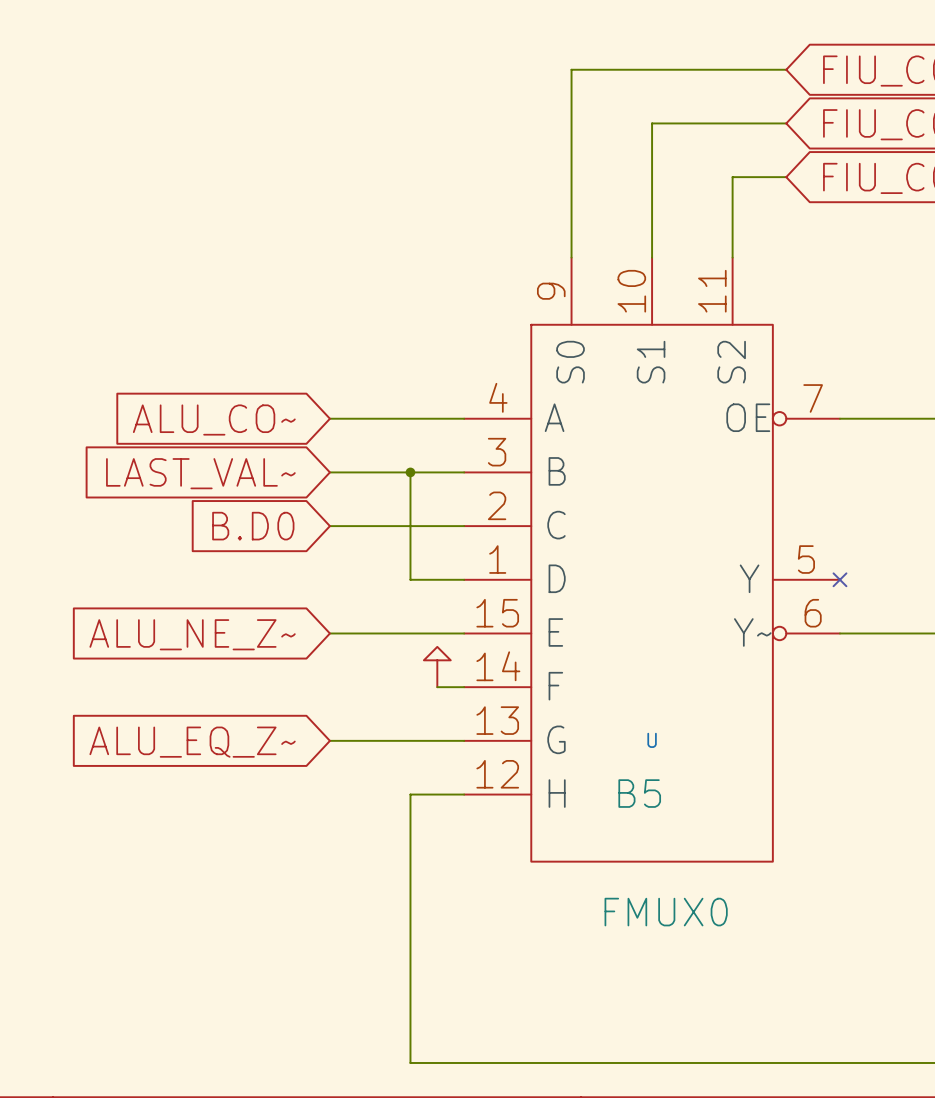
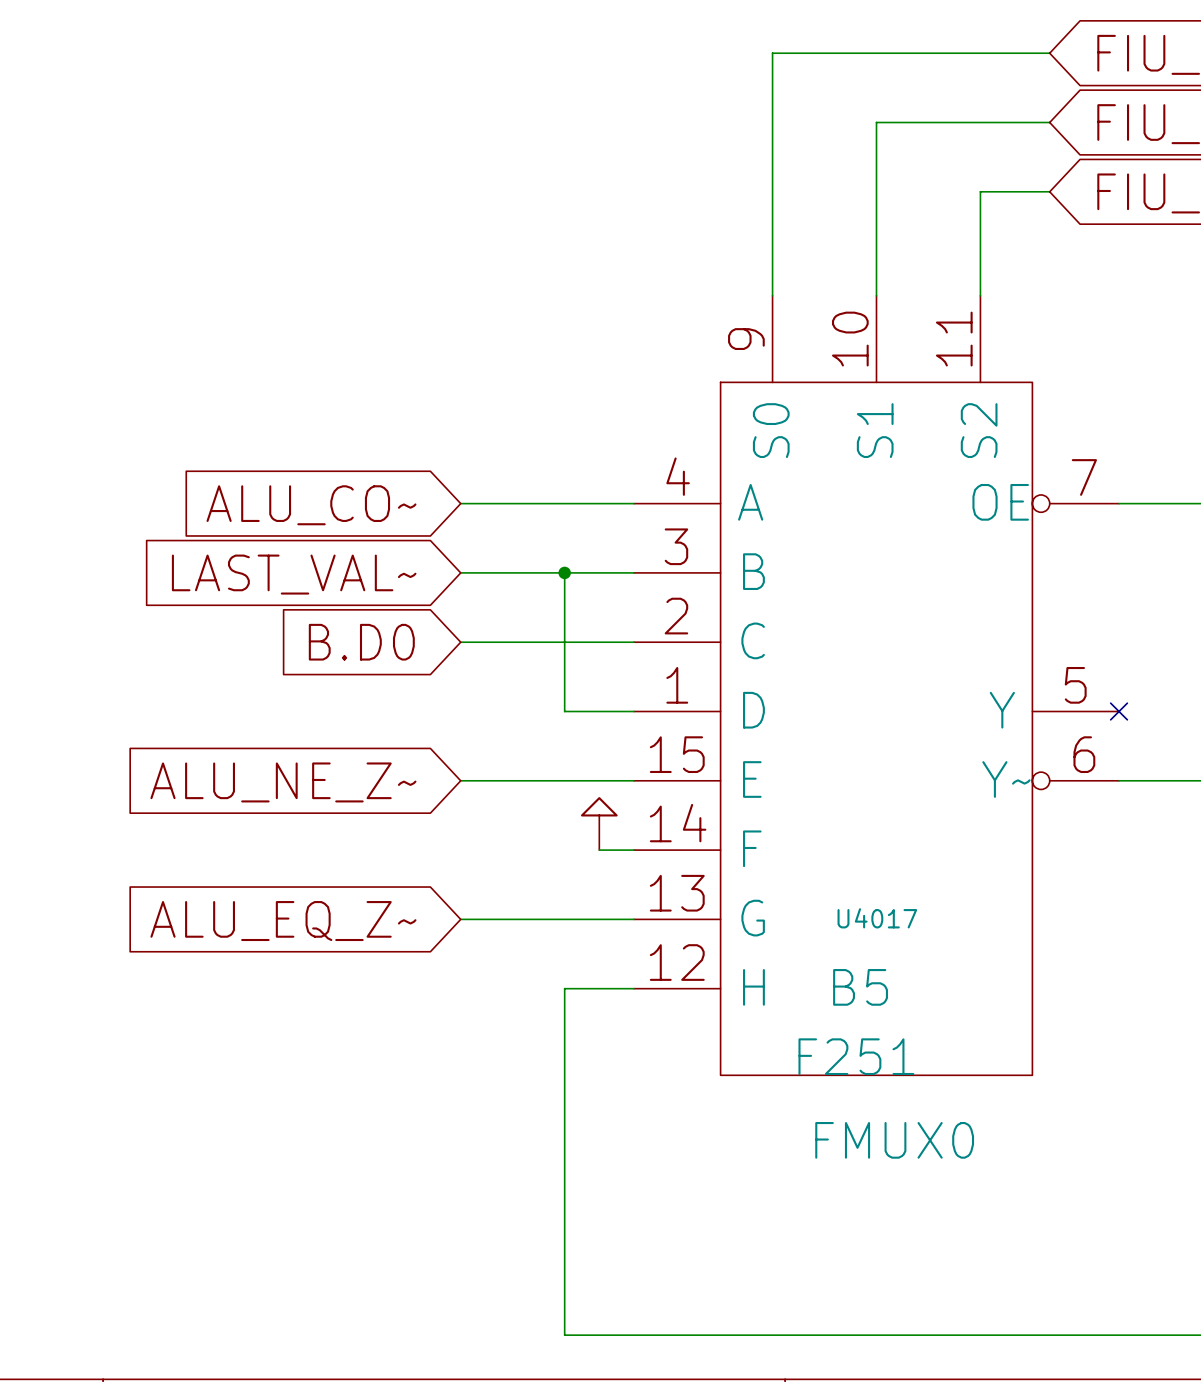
U name: U (652, 740) -> U4017 (877, 918)
U value: none -> F251 (856, 1056)

